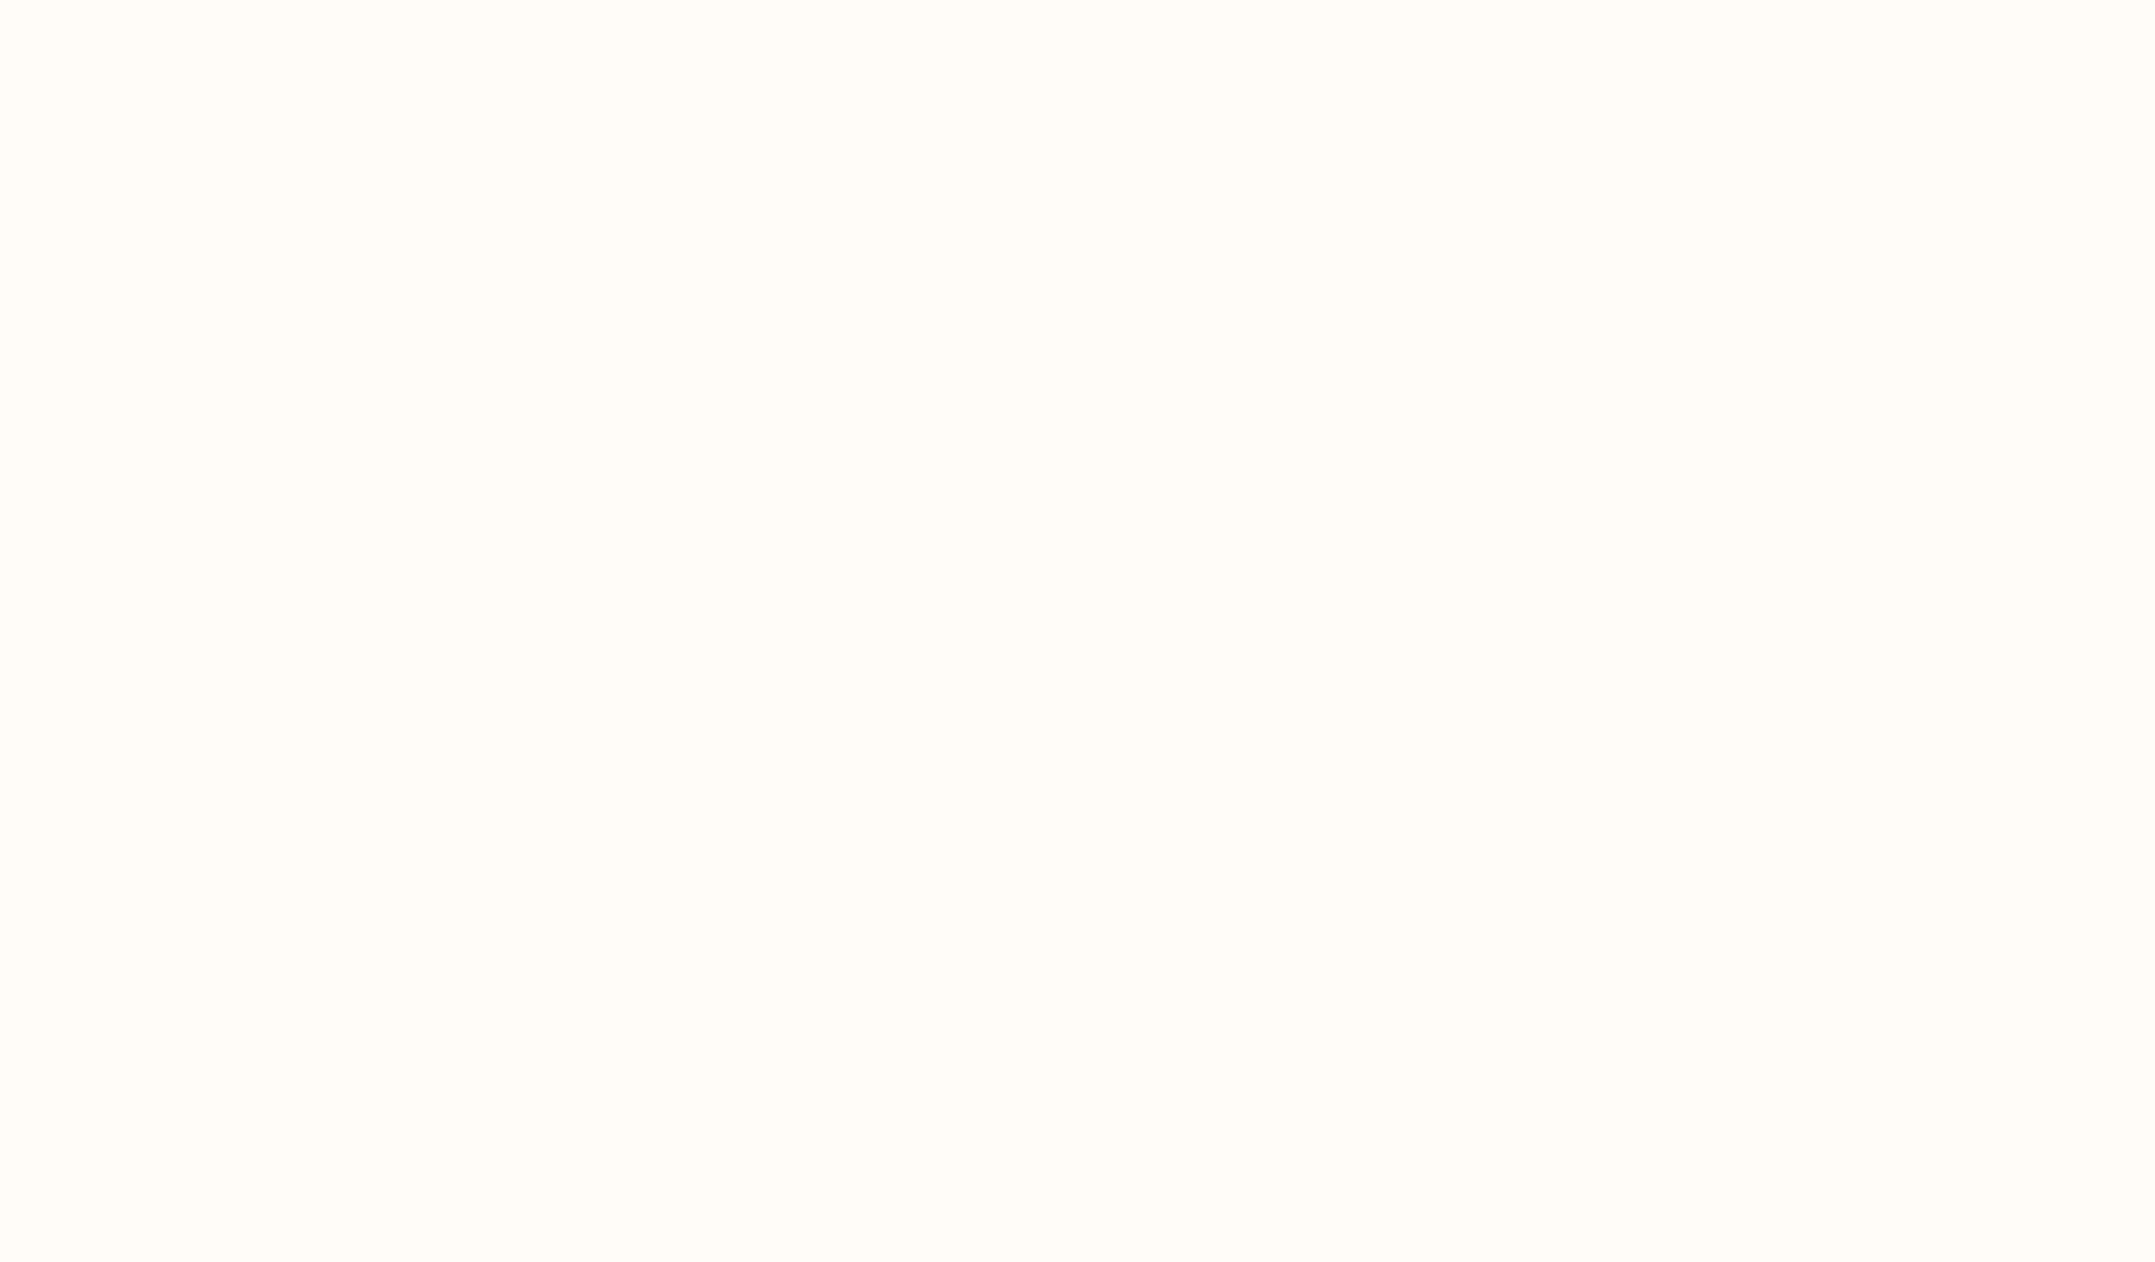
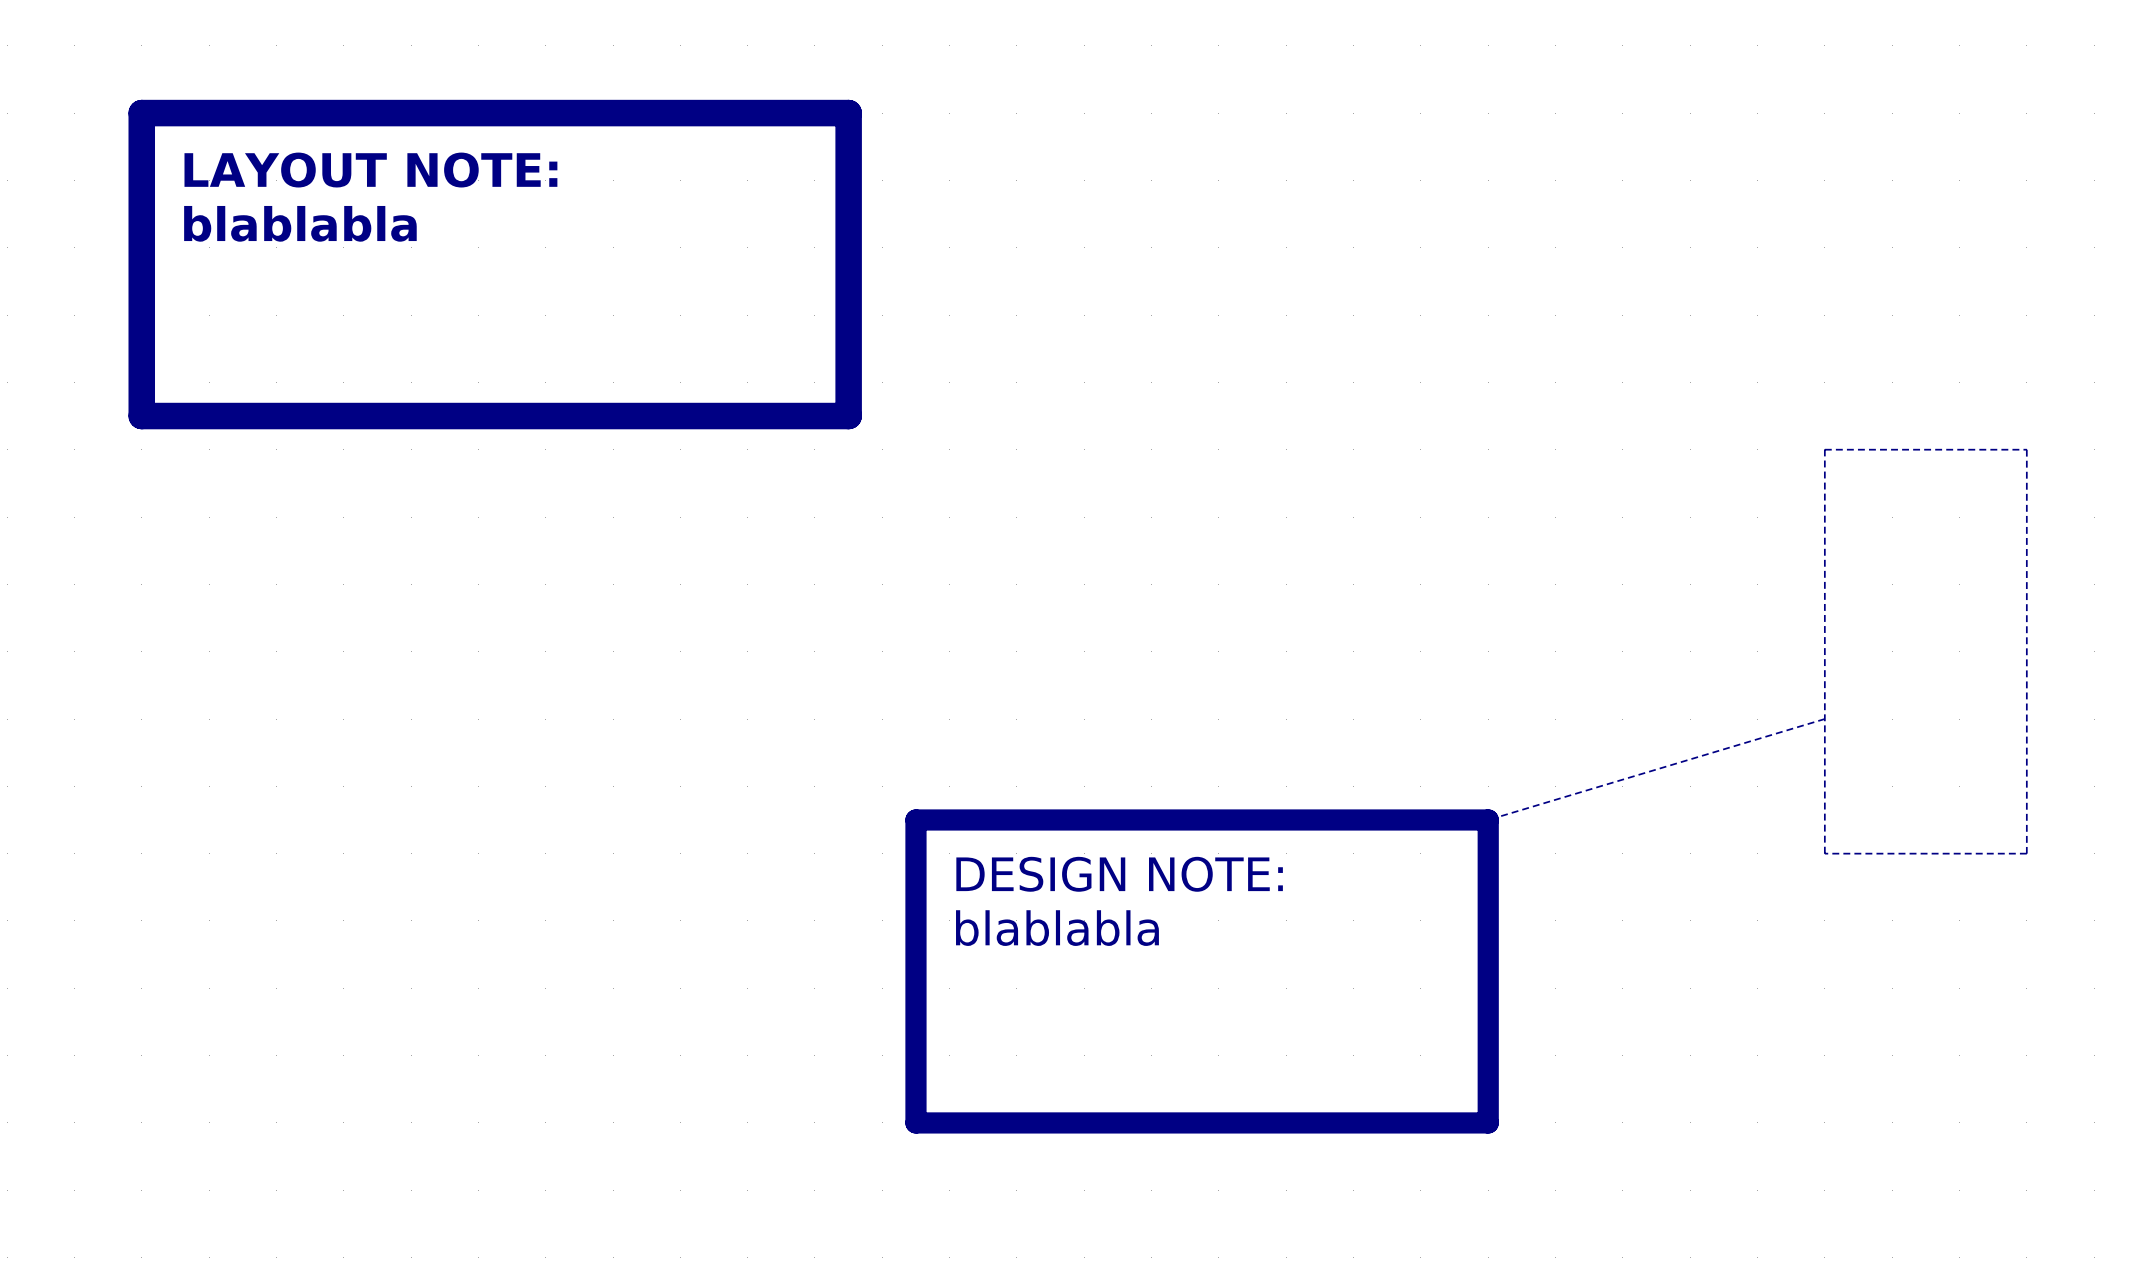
line: none -> (141, 113) (848, 113) (848, 416) (141, 416) (141, 113)
text: none -> LAYOUT NOTE: (370, 170)
text: none -> blablabla (300, 223)
line: none -> (1824, 449) (2026, 449) (2026, 853) (1824, 853) (1824, 449)
line: none -> (1824, 719) (1488, 819)
line: none -> (1488, 819) (915, 819) (915, 1122) (1488, 1122) (1488, 819)
text: none -> DESIGN NOTE: (1119, 874)
text: none -> blablabla (1057, 928)

